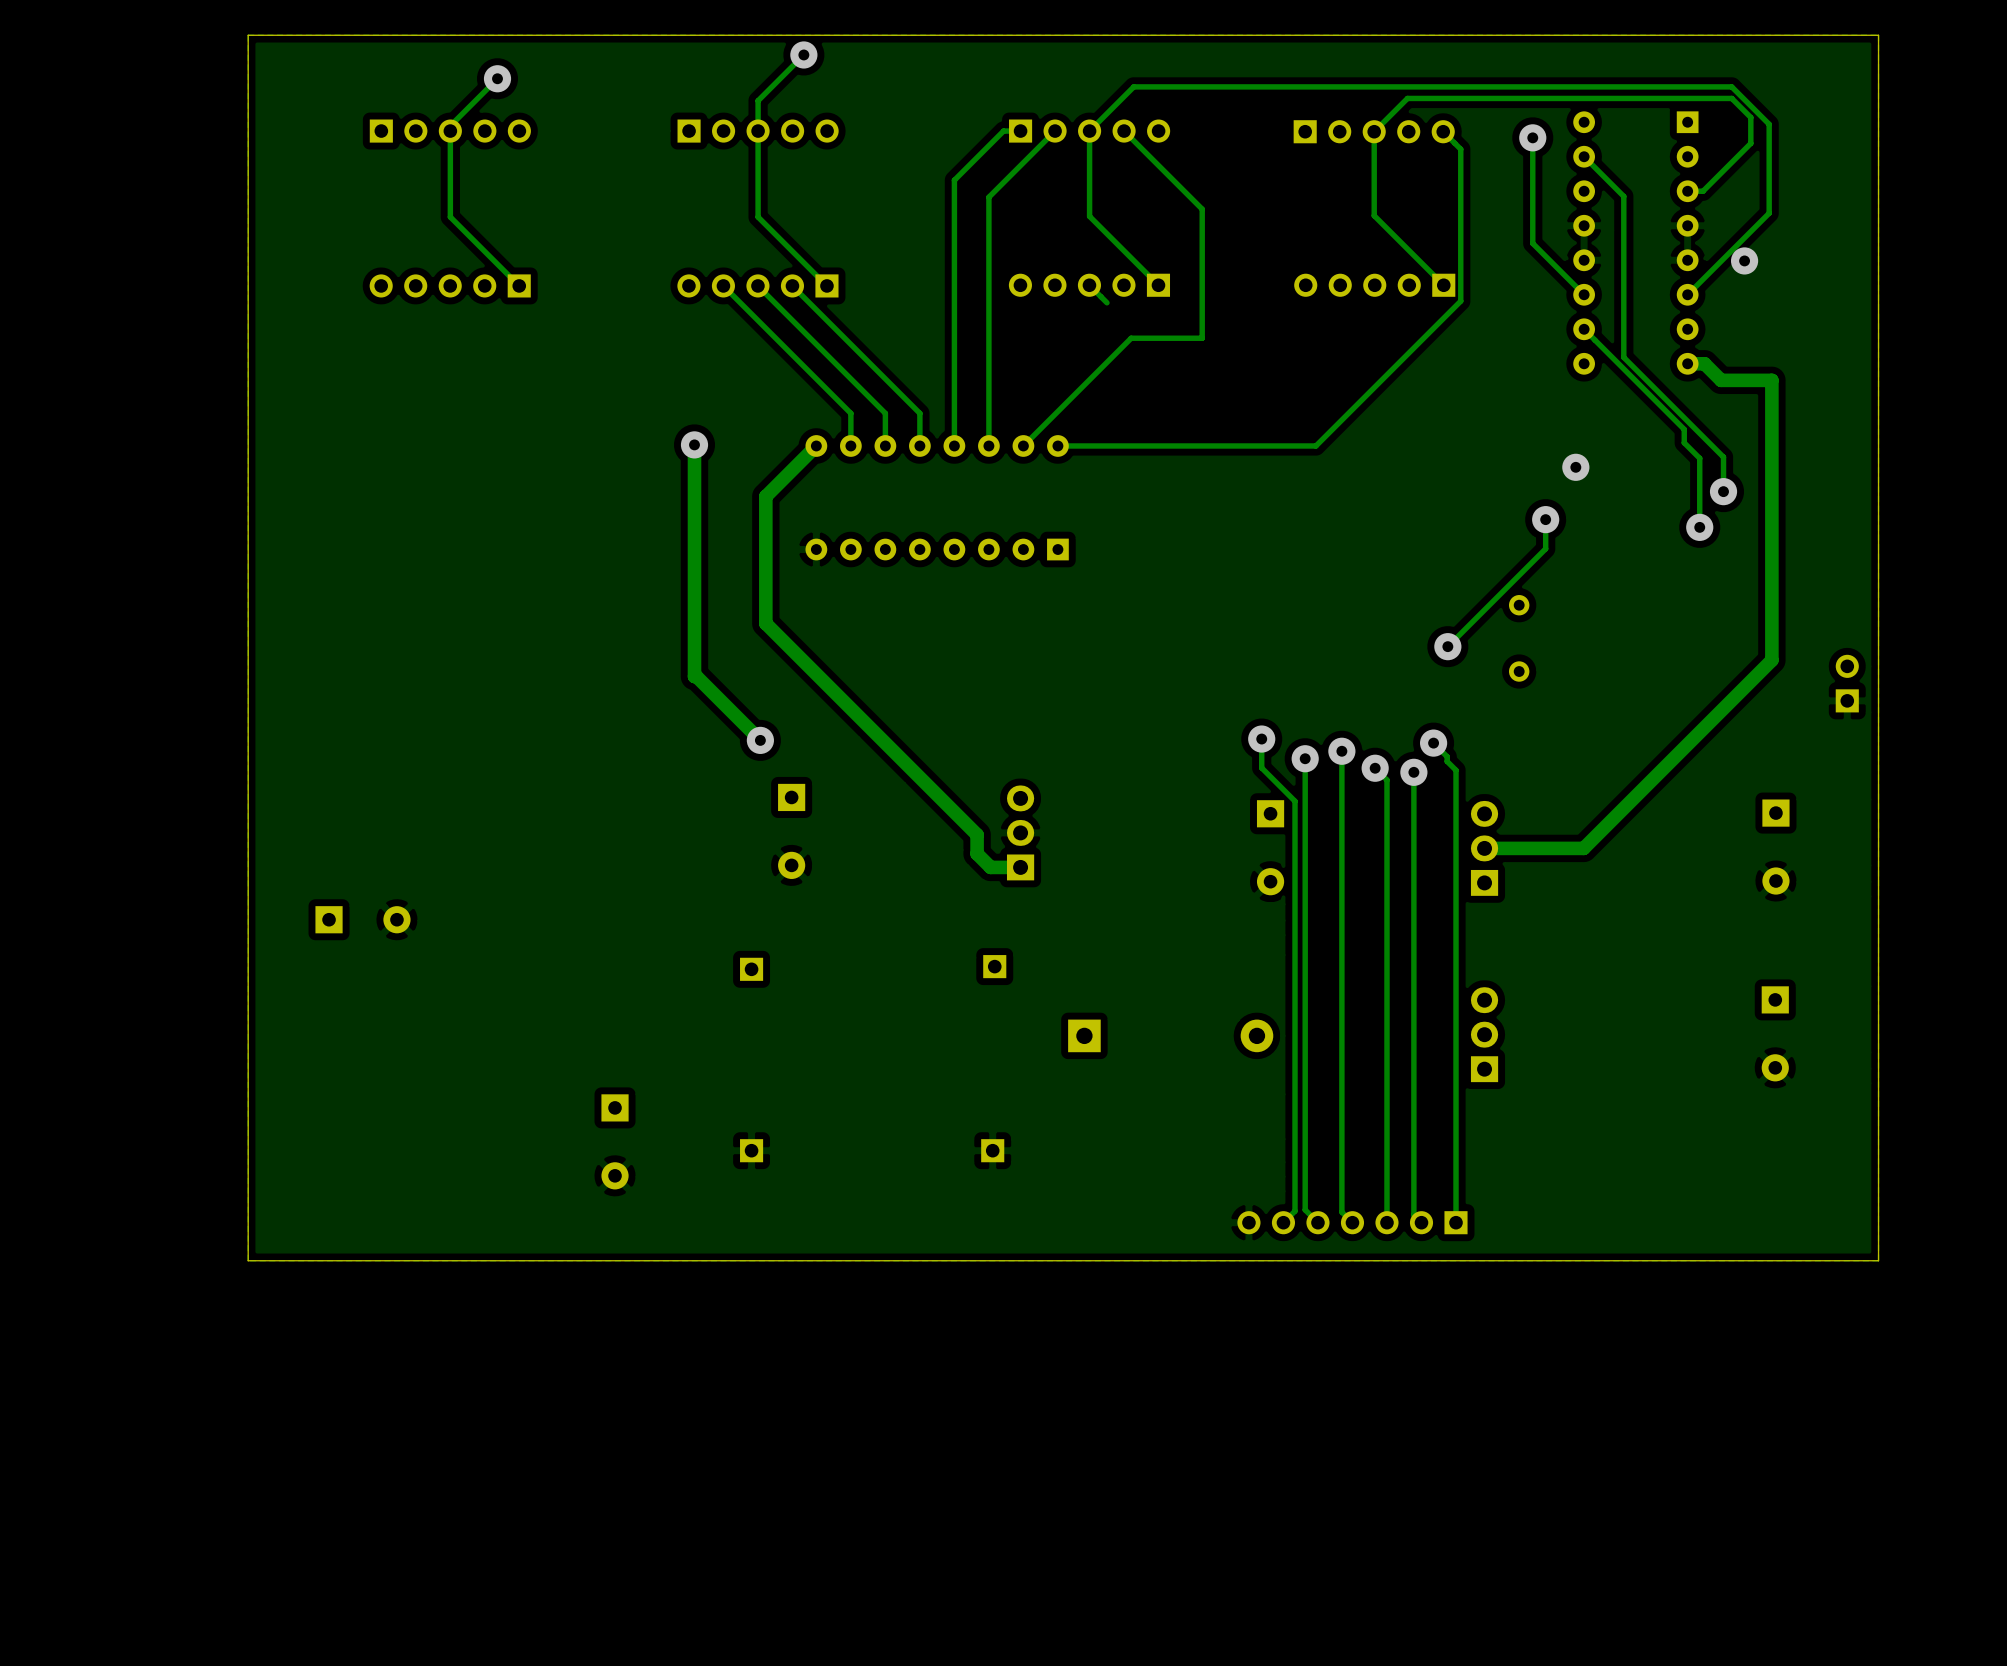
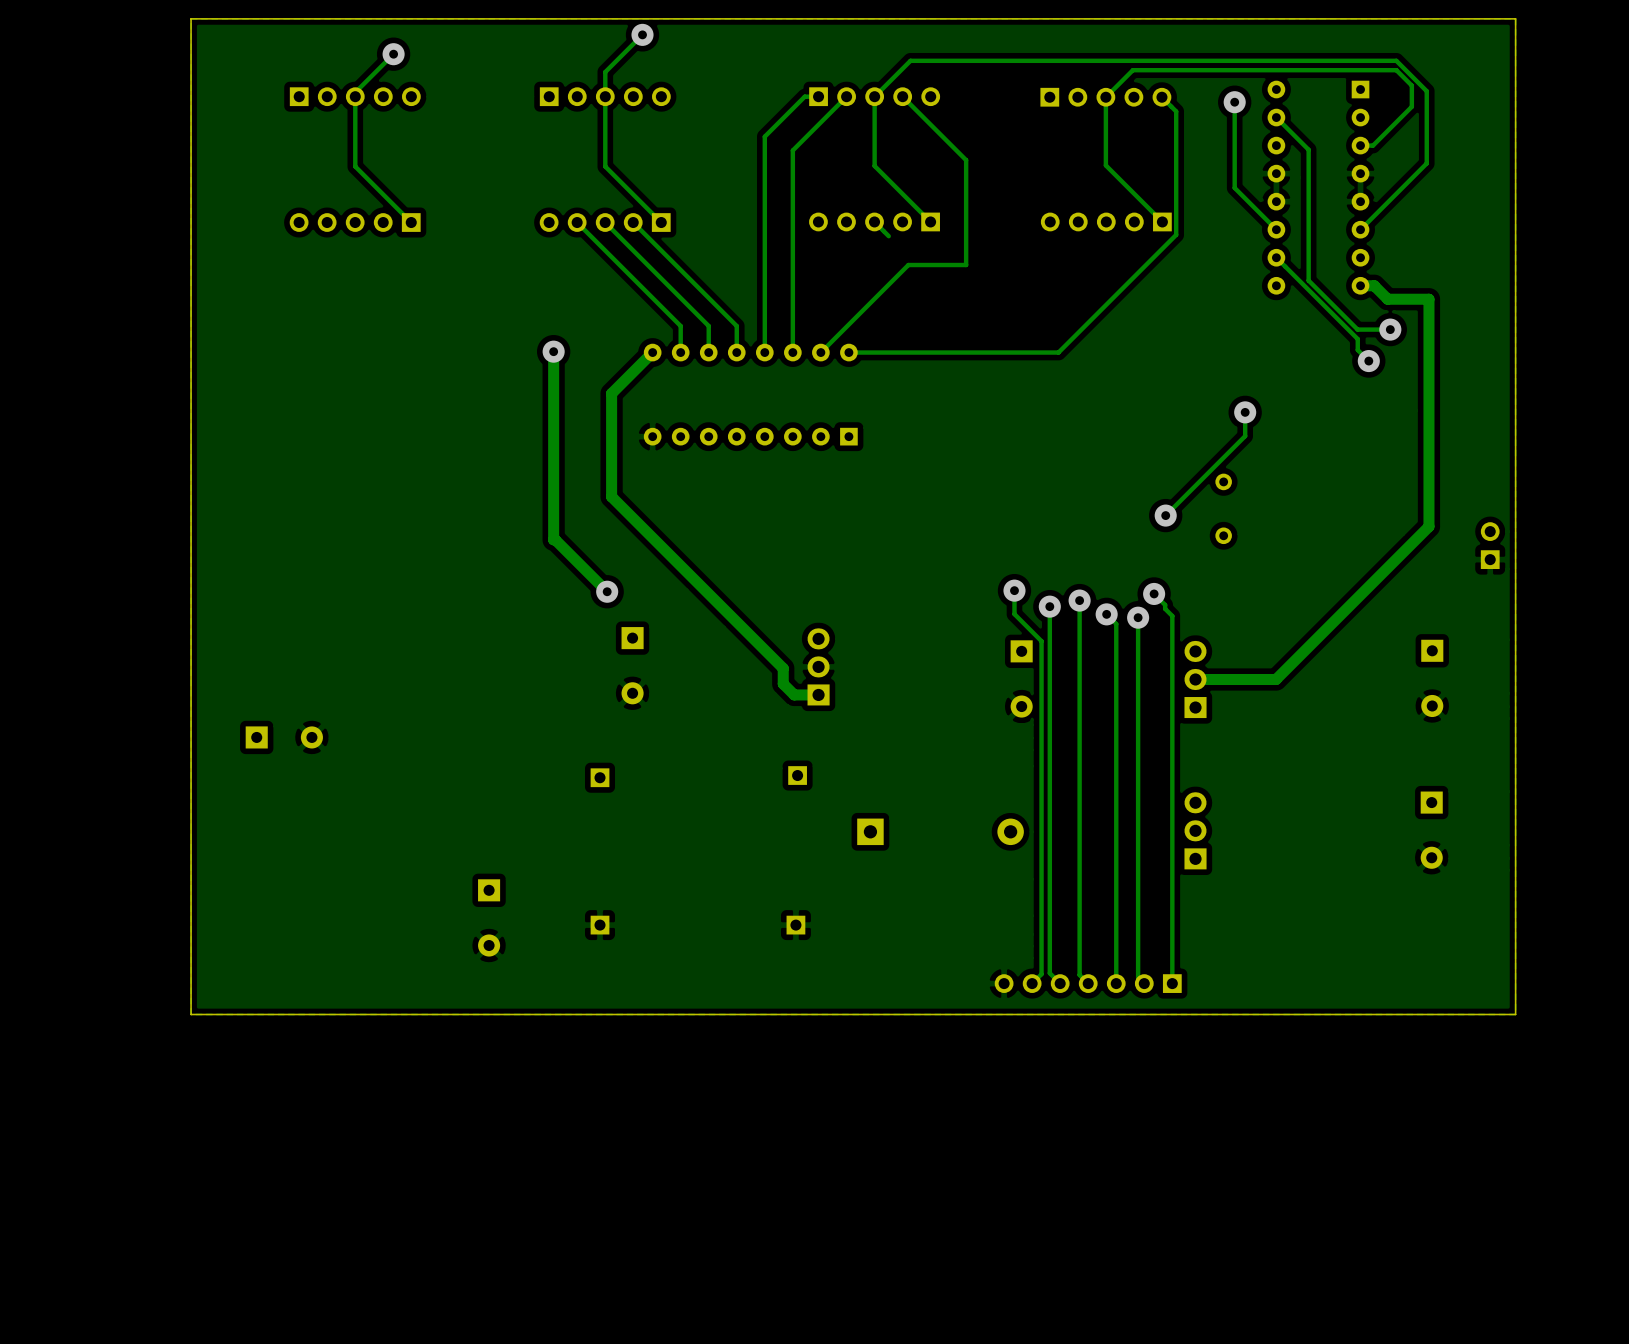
via: (1744, 260) -> none
track: (1684, 417) (1723, 457) (1723, 491) -> (1357, 329) (1390, 329)
via: none -> (1390, 329)
track: (1697, 456) (1699, 458) (1699, 527) -> none
via: none -> (1368, 361)
via: (1575, 467) -> none
via: (1723, 491) -> none
via: (1699, 527) -> none

